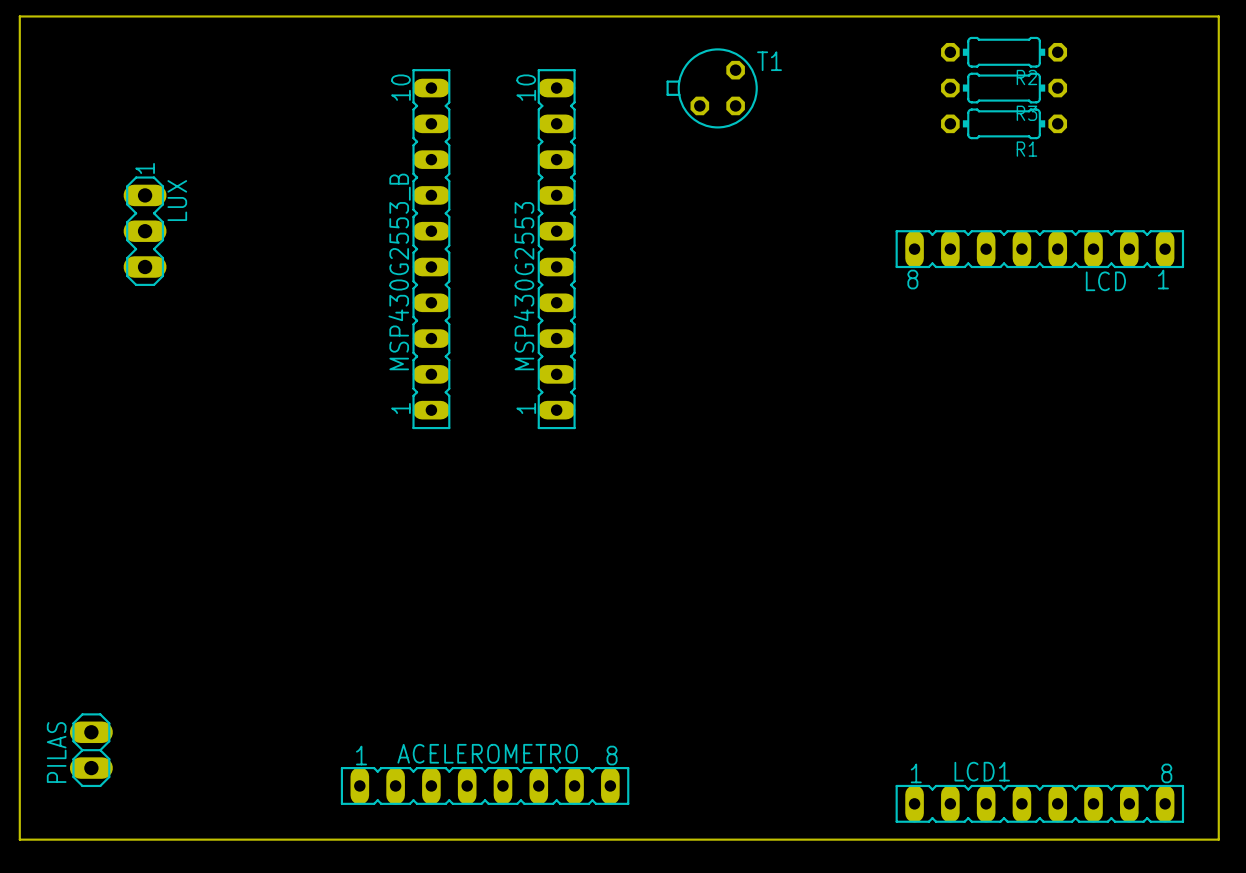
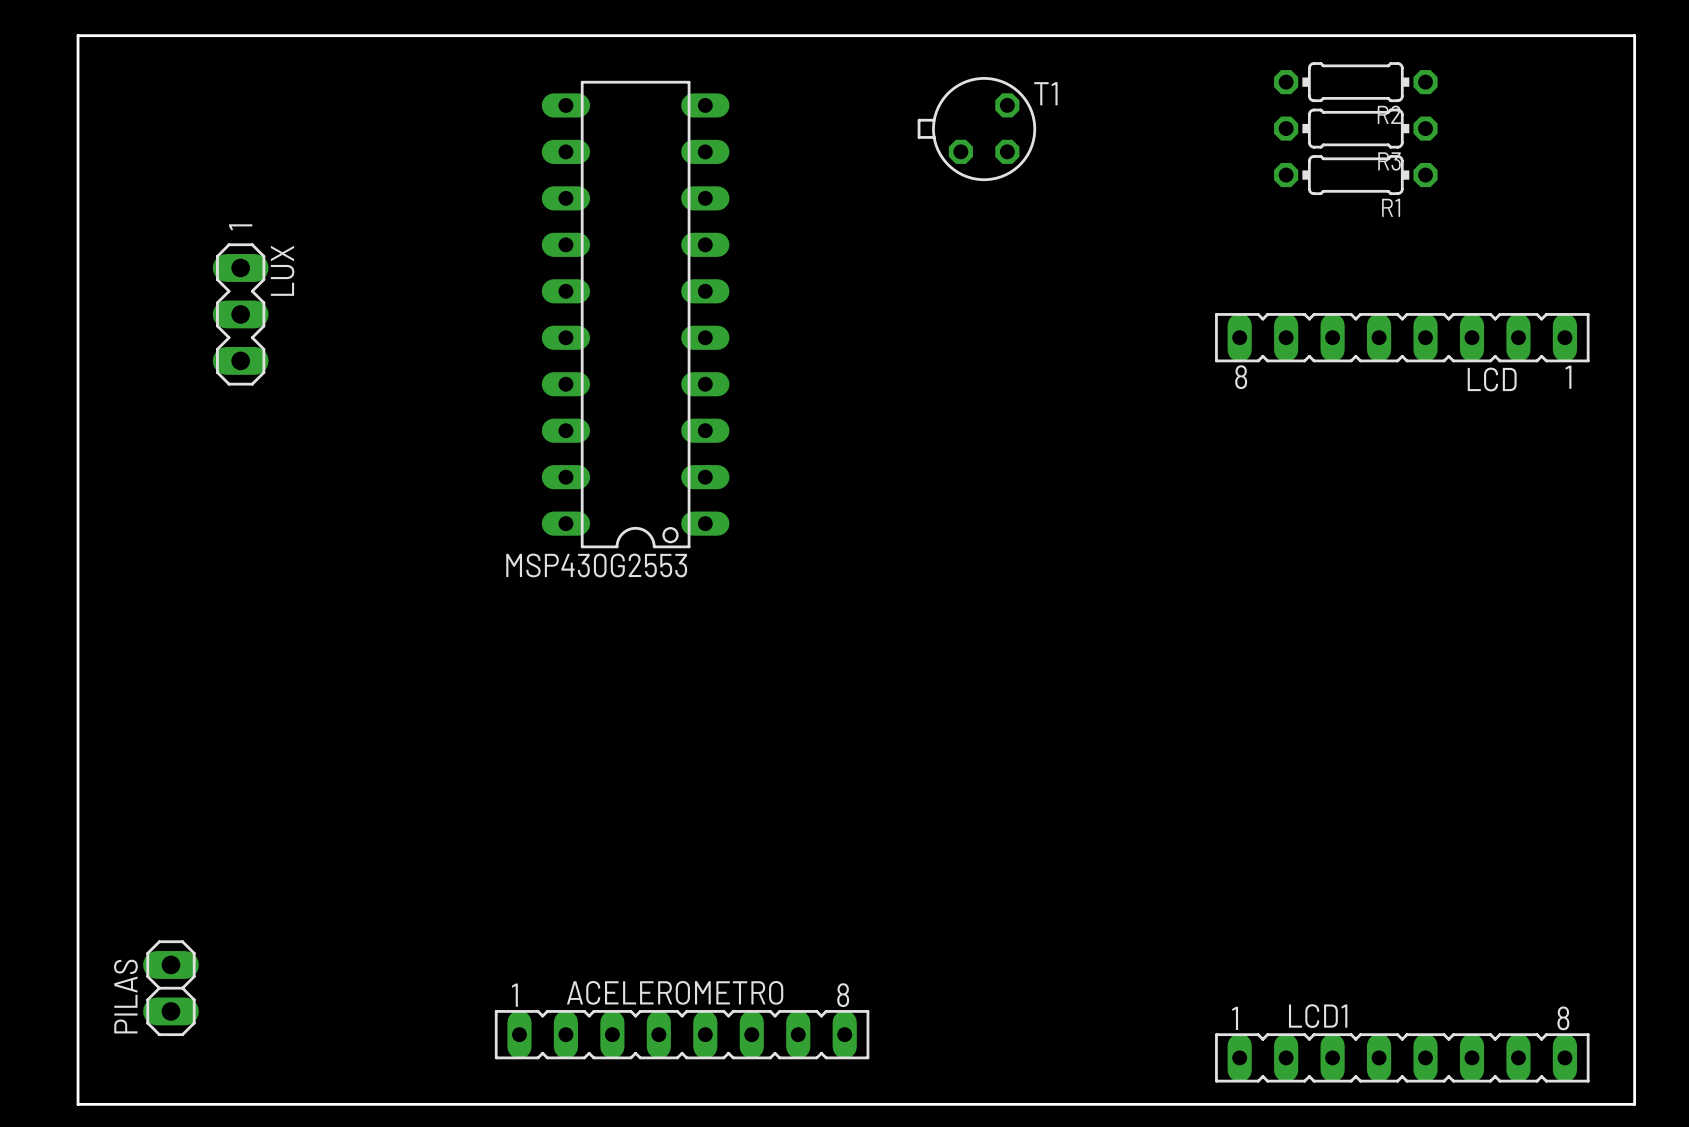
MSP430G2553 footprint: [537, 69, 576, 430] -> [541, 80, 730, 549]
MSP430G2553_B: (431, 249) -> none
MSP430G2553 name position: MSP430G2553 (524, 286) -> MSP430G2553 (596, 565)

